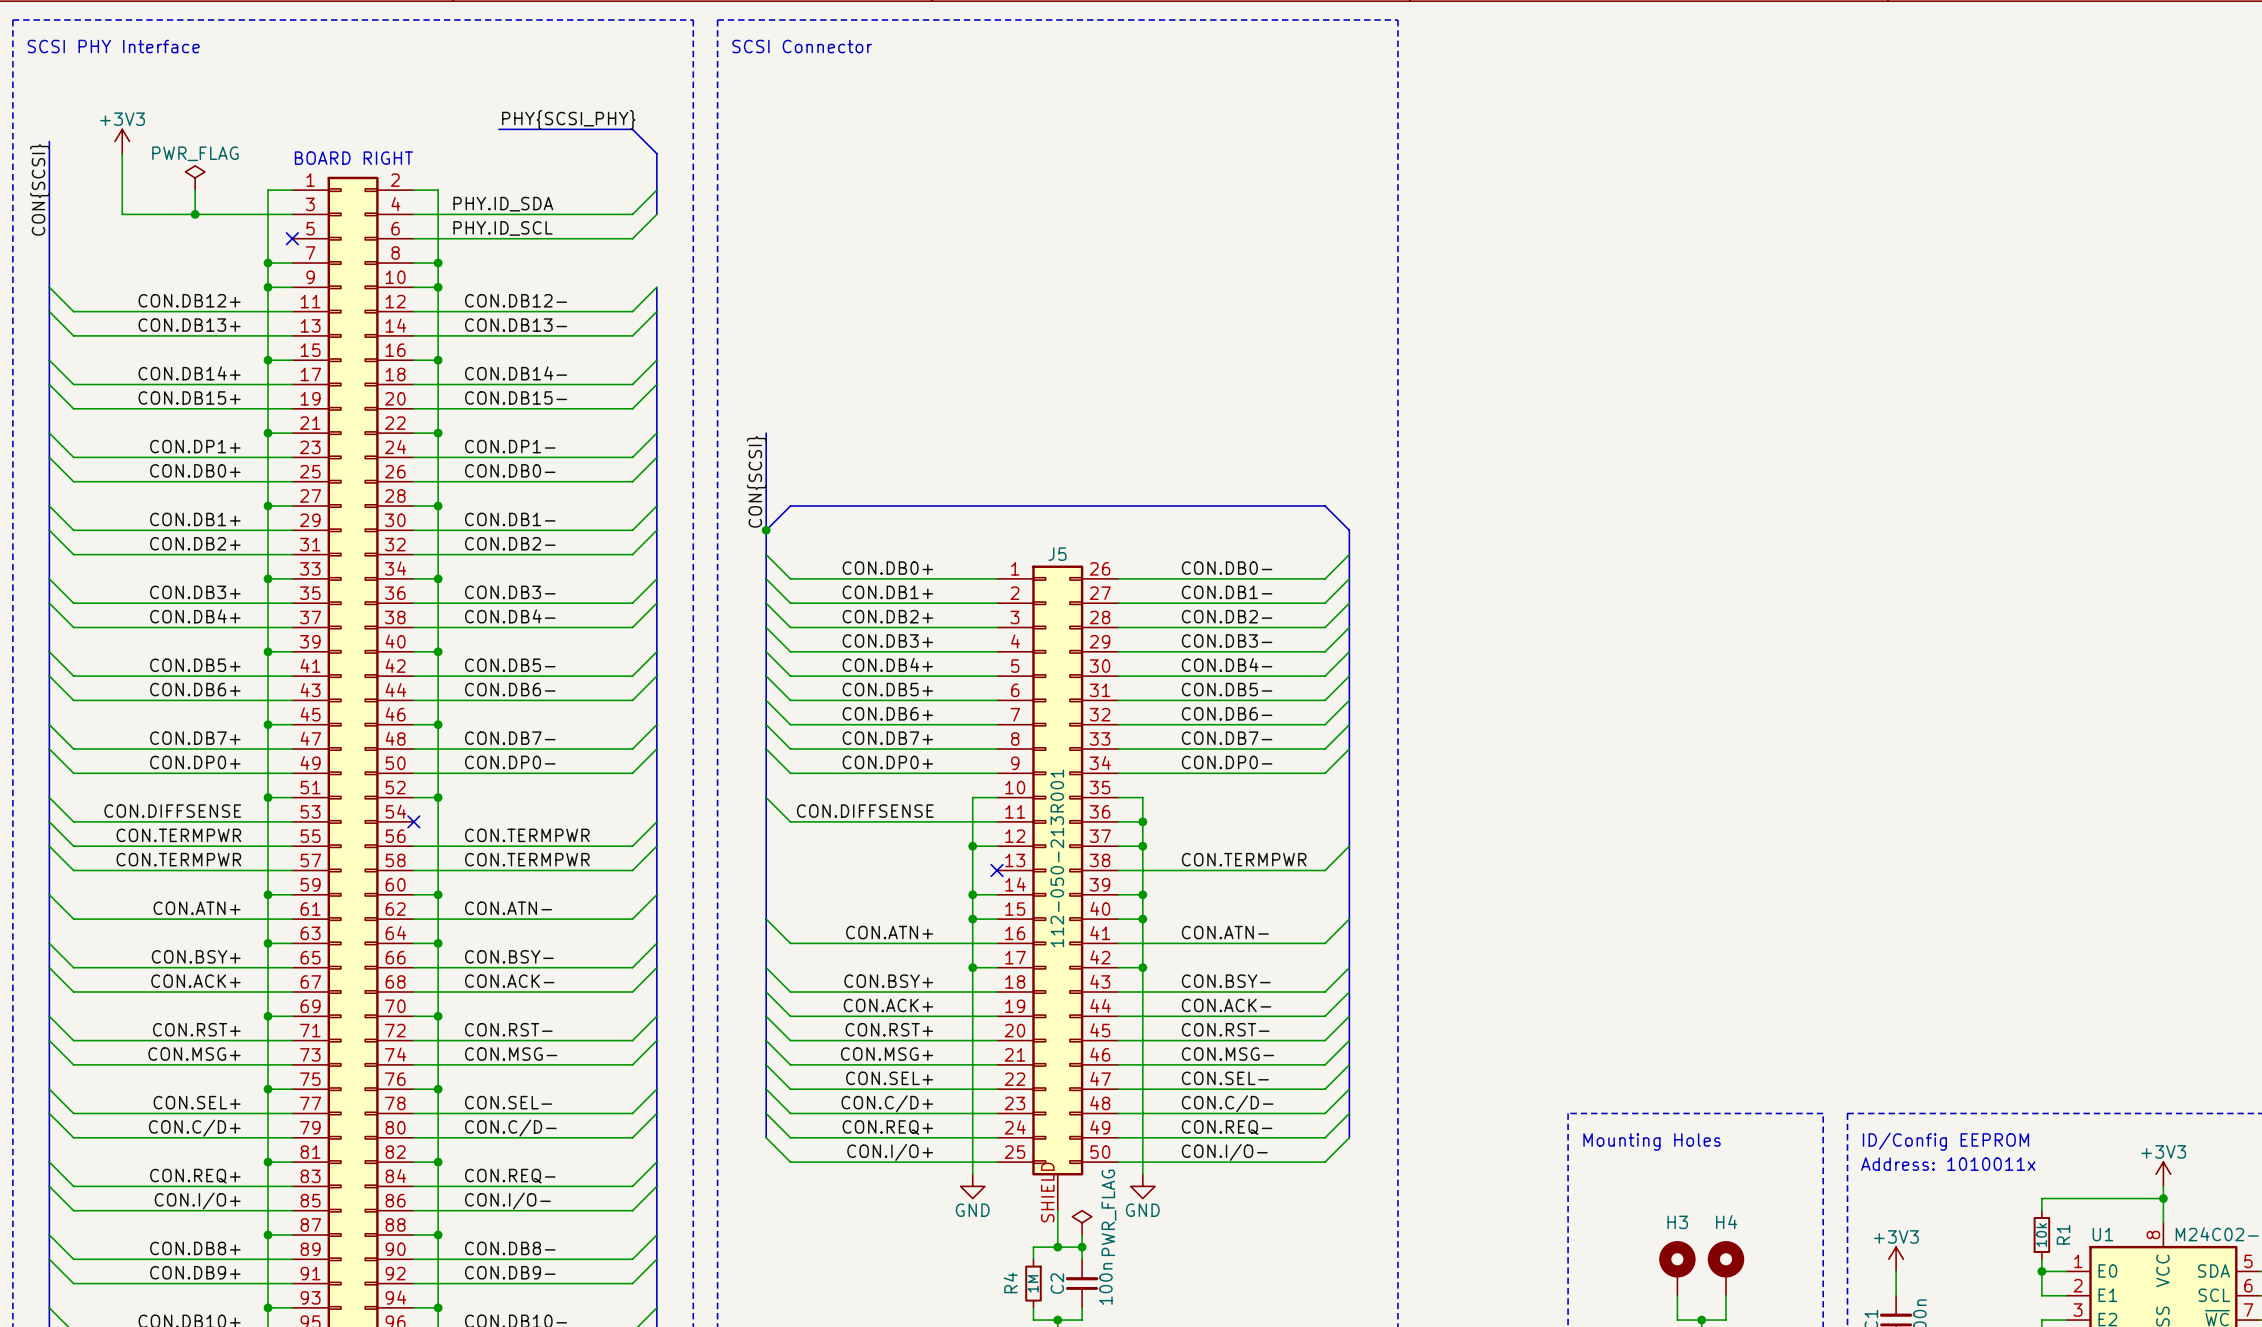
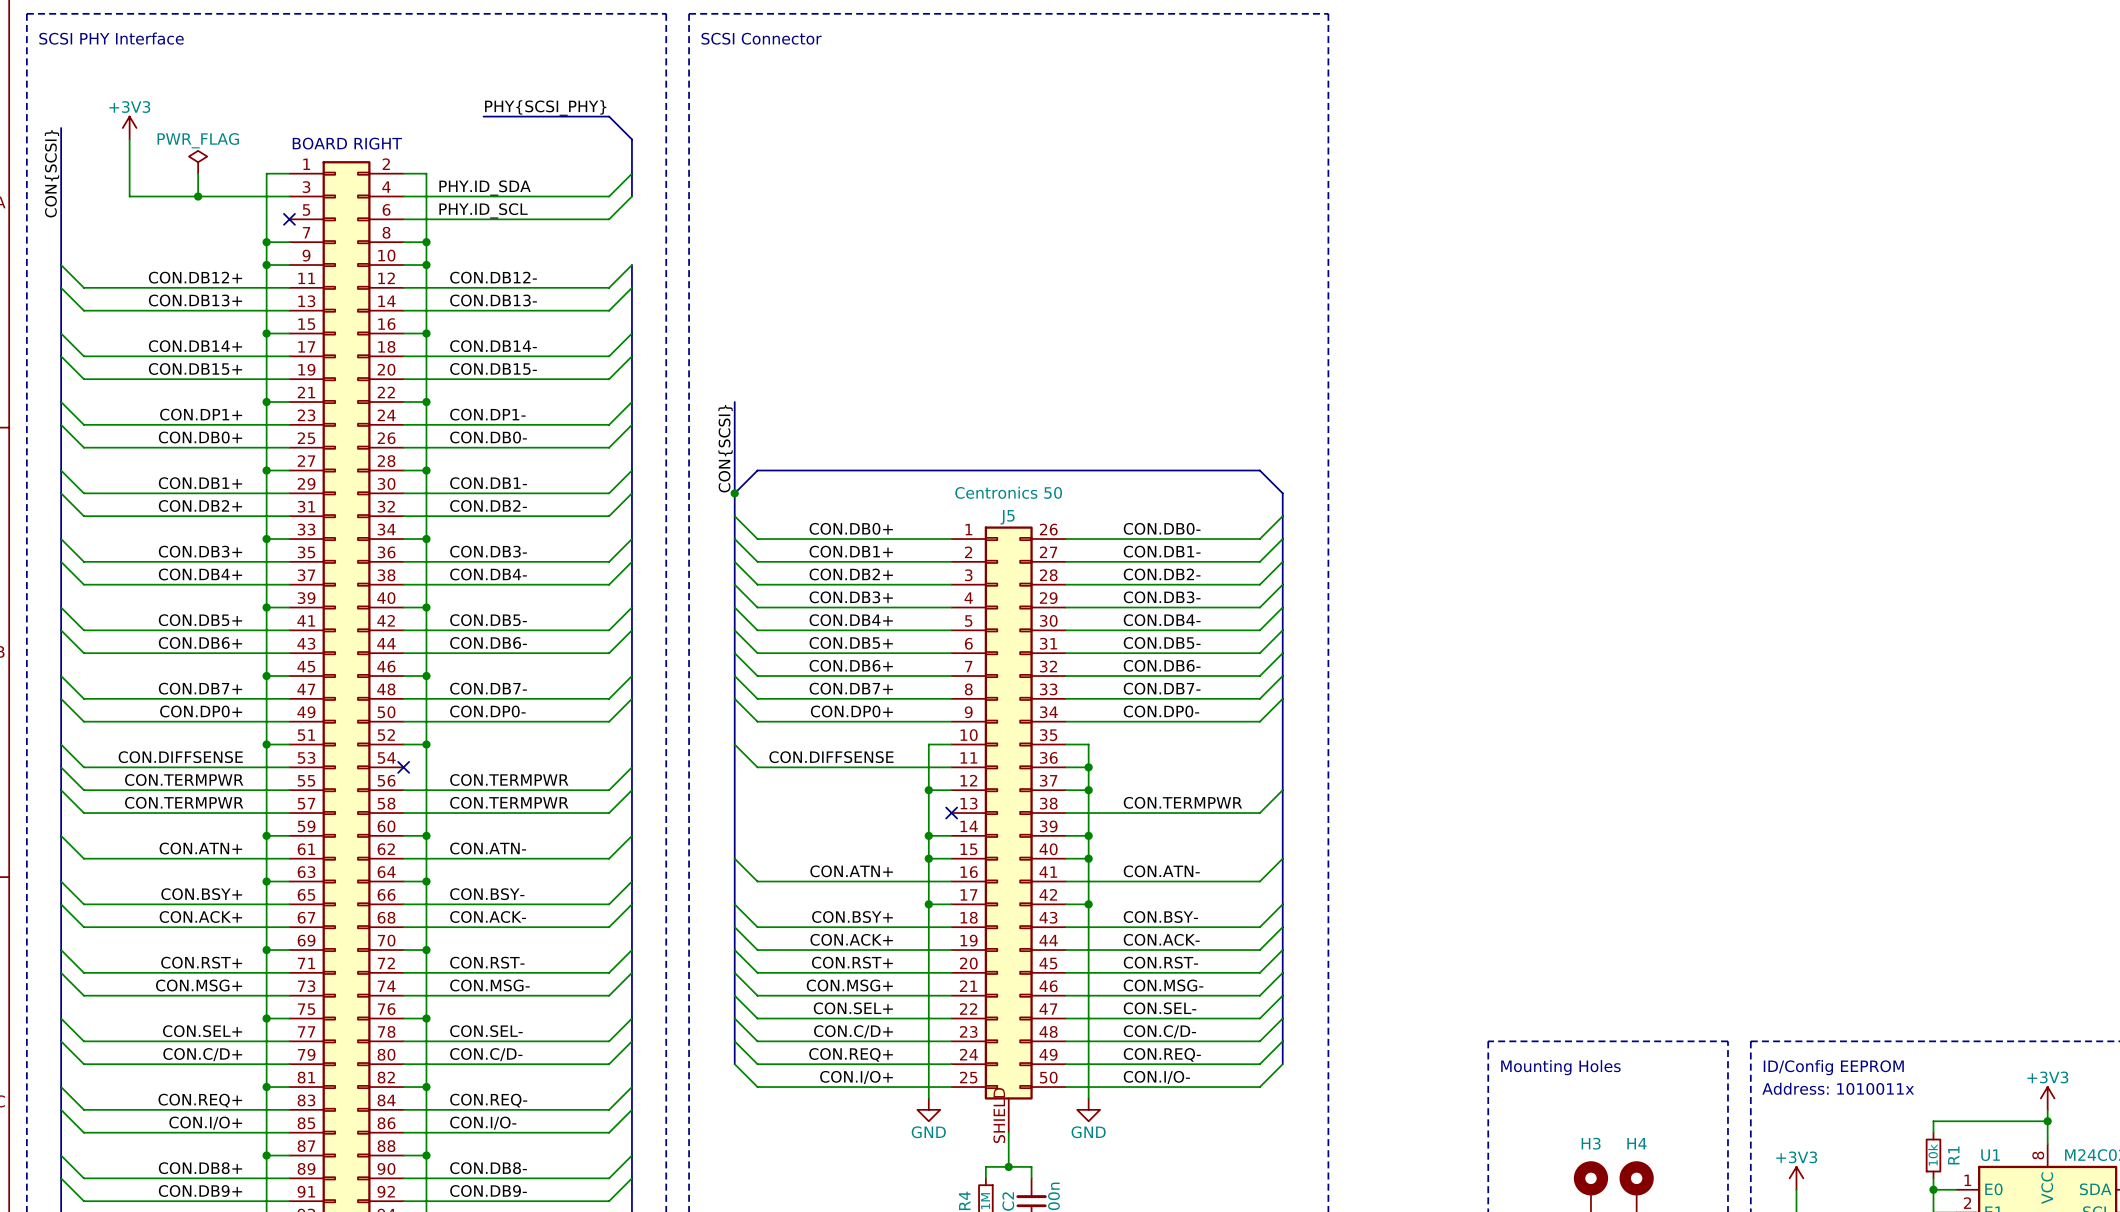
J5 value: 112-050-213R001 (1057, 858) -> Centronics 50 (1008, 492)
power symbol: PWR_FLAG (1082, 1222) -> none
wire: (1082, 1234) (1082, 1247) -> none
junction: (1082, 1247) -> none

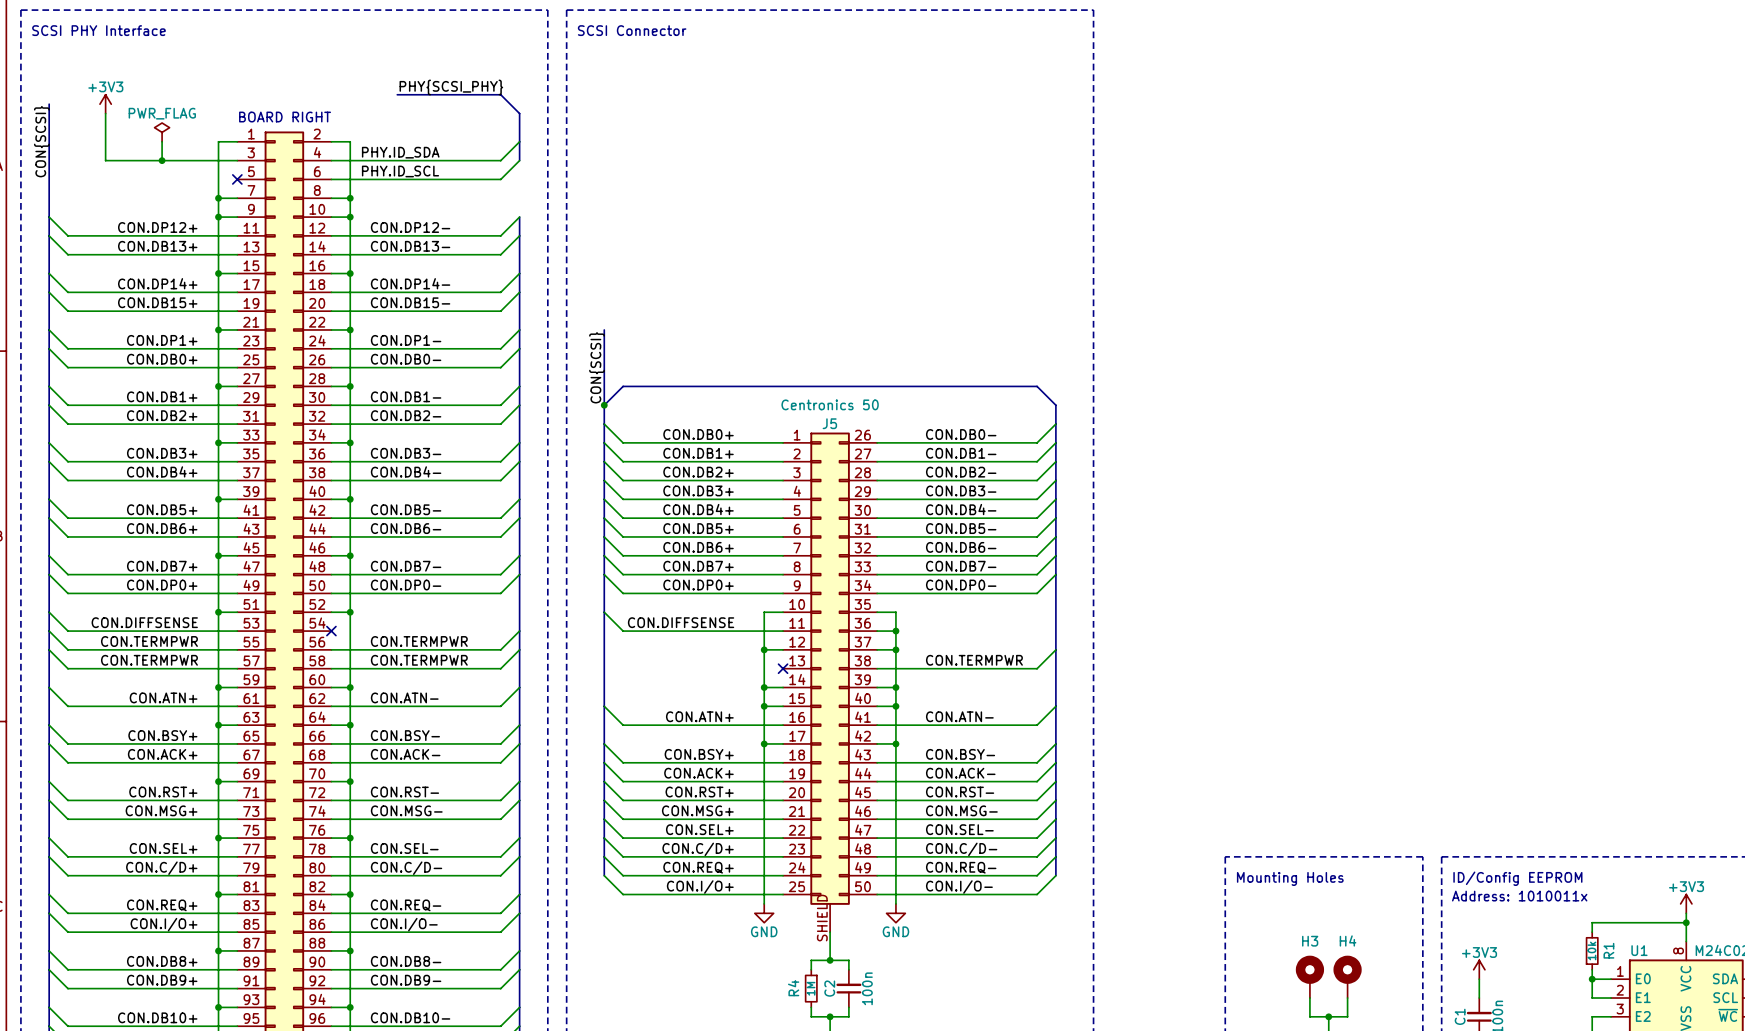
label: CON.DB12+ (195, 277) -> CON.DP12+ (157, 227)
label: CON.DB12- (493, 277) -> CON.DP12- (410, 227)
label: CON.DB14+ (195, 346) -> CON.DP14+ (157, 283)
label: CON.DB14- (493, 346) -> CON.DP14- (410, 283)

